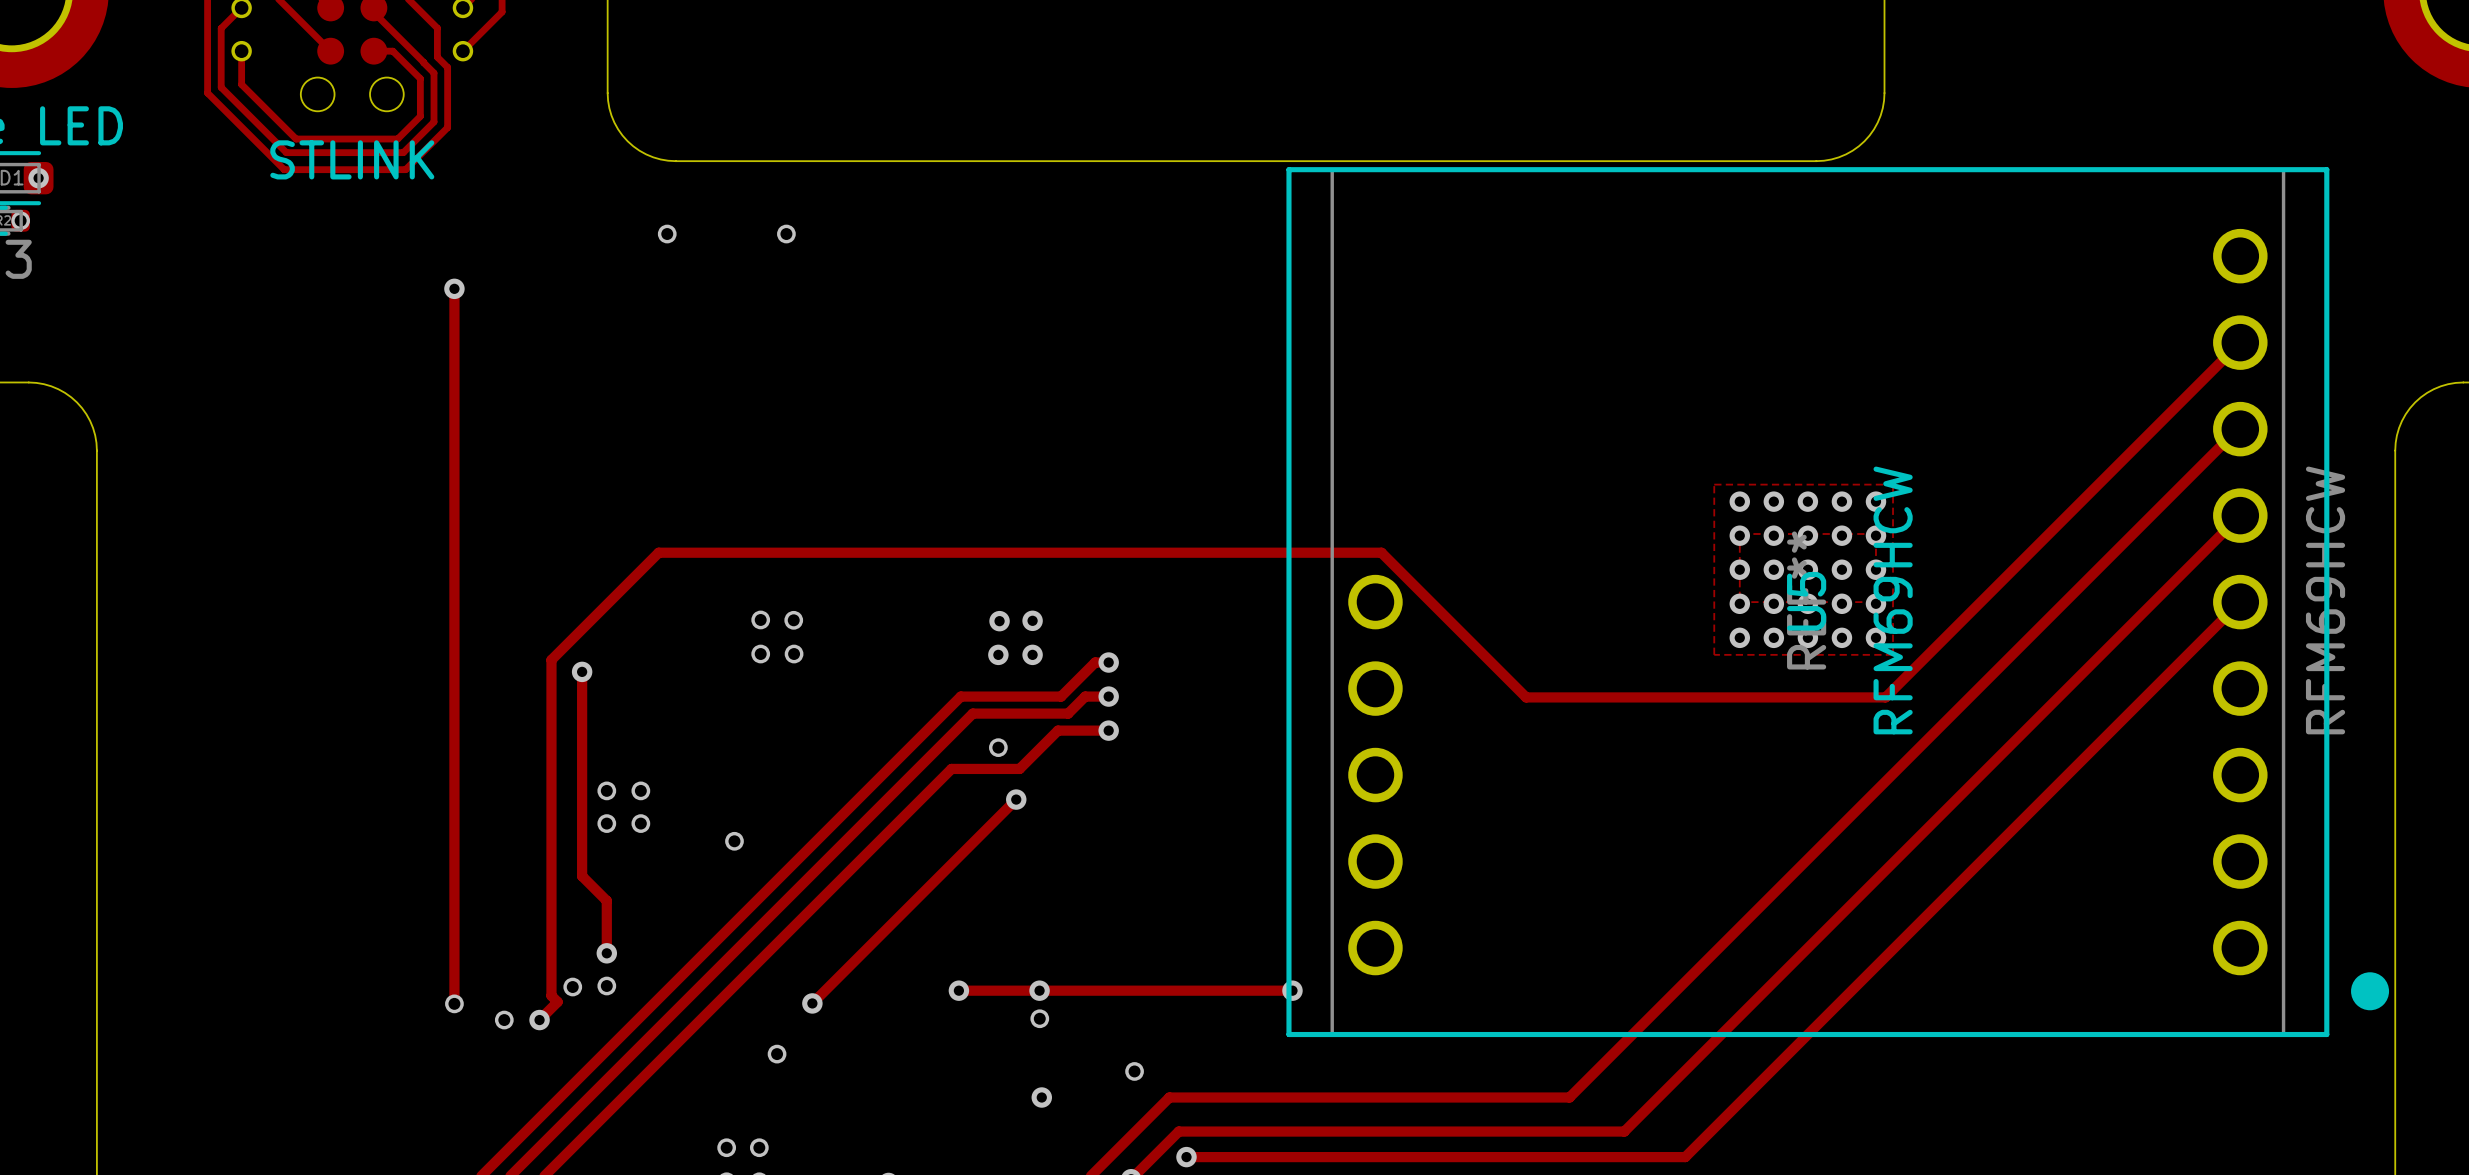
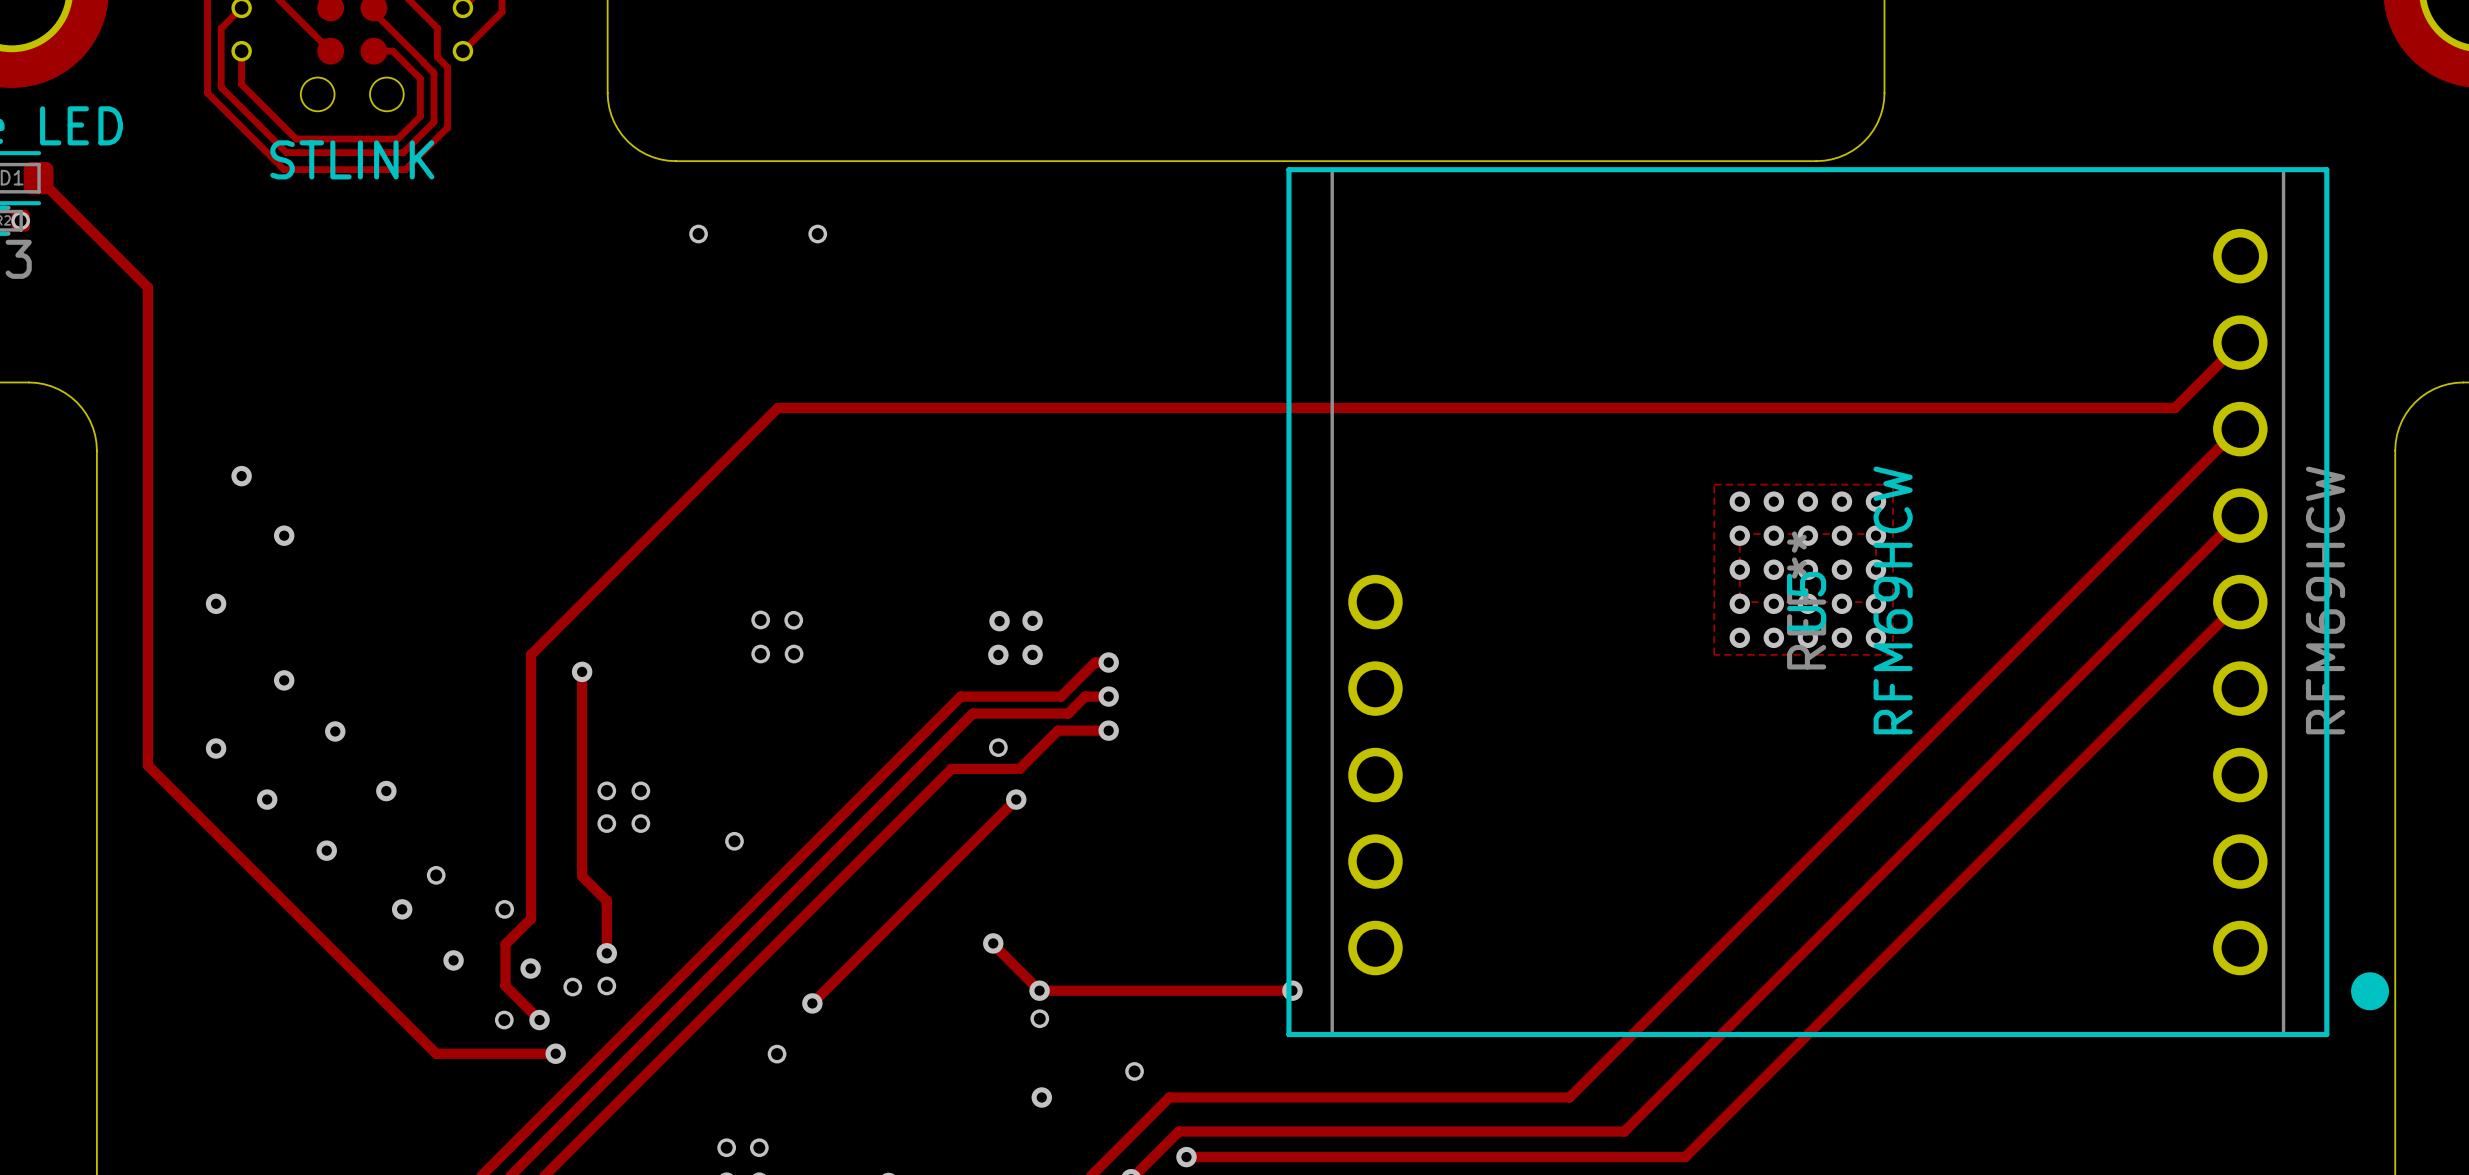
track: none -> (38, 178) (147, 287) (147, 765) (436, 1053) (555, 1053)
via: (38, 178) -> none
via position: (667, 234) -> (698, 234)
via position: (786, 234) -> (817, 234)
track: (454, 288) (454, 1003) -> none
via: (454, 288) -> none
track: (2174, 408) (1885, 697) (1526, 697) (1381, 552) (658, 552) (551, 659) (551, 995) (557, 1001) (539, 1020) -> (2174, 408) (777, 408) (531, 654) (531, 918) (505, 944) (505, 985) (539, 1020)
via: none -> (241, 476)
via: none -> (284, 535)
via: none -> (216, 603)
via: none -> (284, 680)
via: none -> (335, 731)
via: none -> (216, 748)
via: none -> (386, 791)
via: none -> (267, 799)
via: none -> (326, 850)
via: none -> (436, 875)
via: none -> (402, 909)
via: none -> (504, 909)
via: none -> (453, 960)
via: none -> (530, 968)
track: (958, 990) (1039, 990) -> (993, 943) (1039, 990)
via position: (958, 990) -> (993, 943)
via: (454, 1003) -> none
via: none -> (555, 1053)

